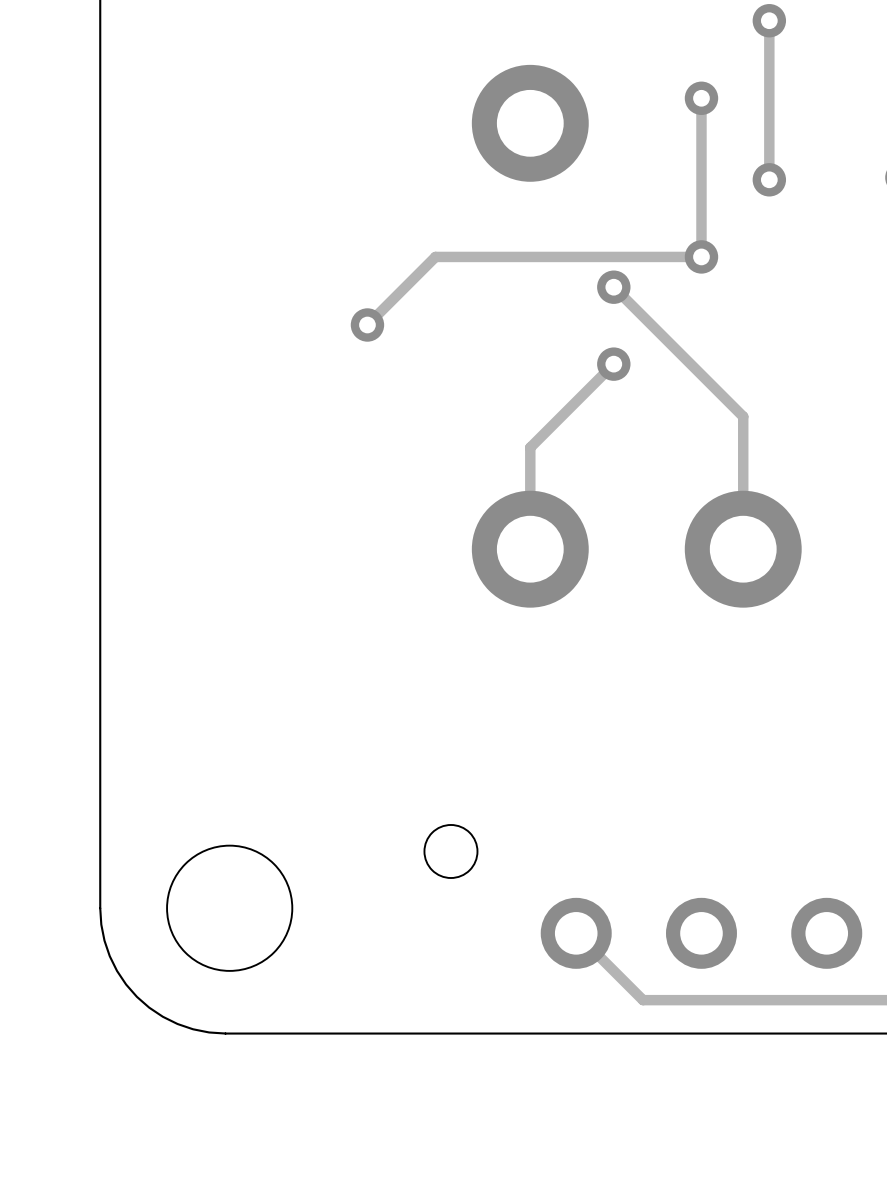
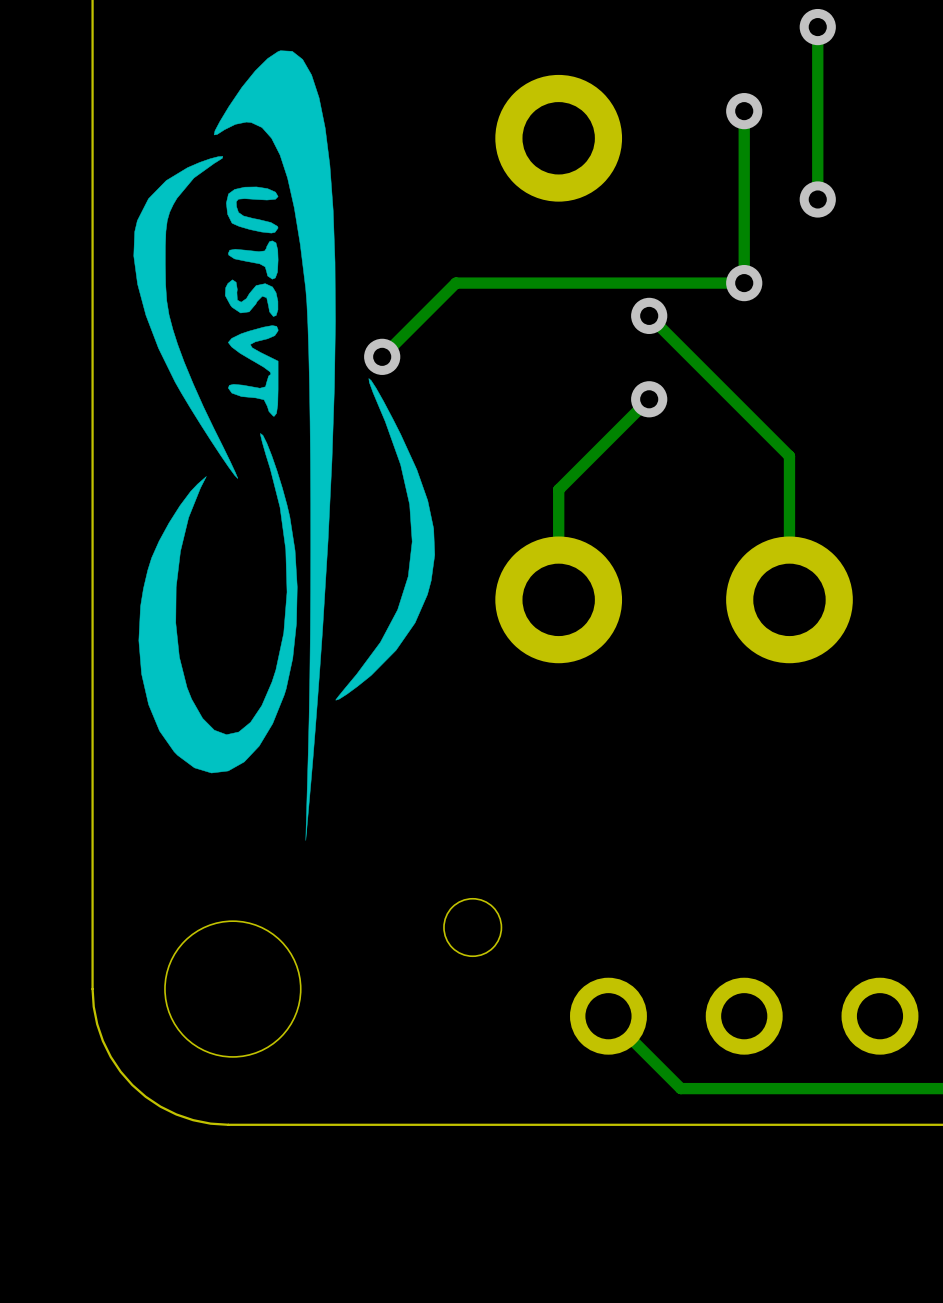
drawing: none -> [133, 50, 435, 841]

